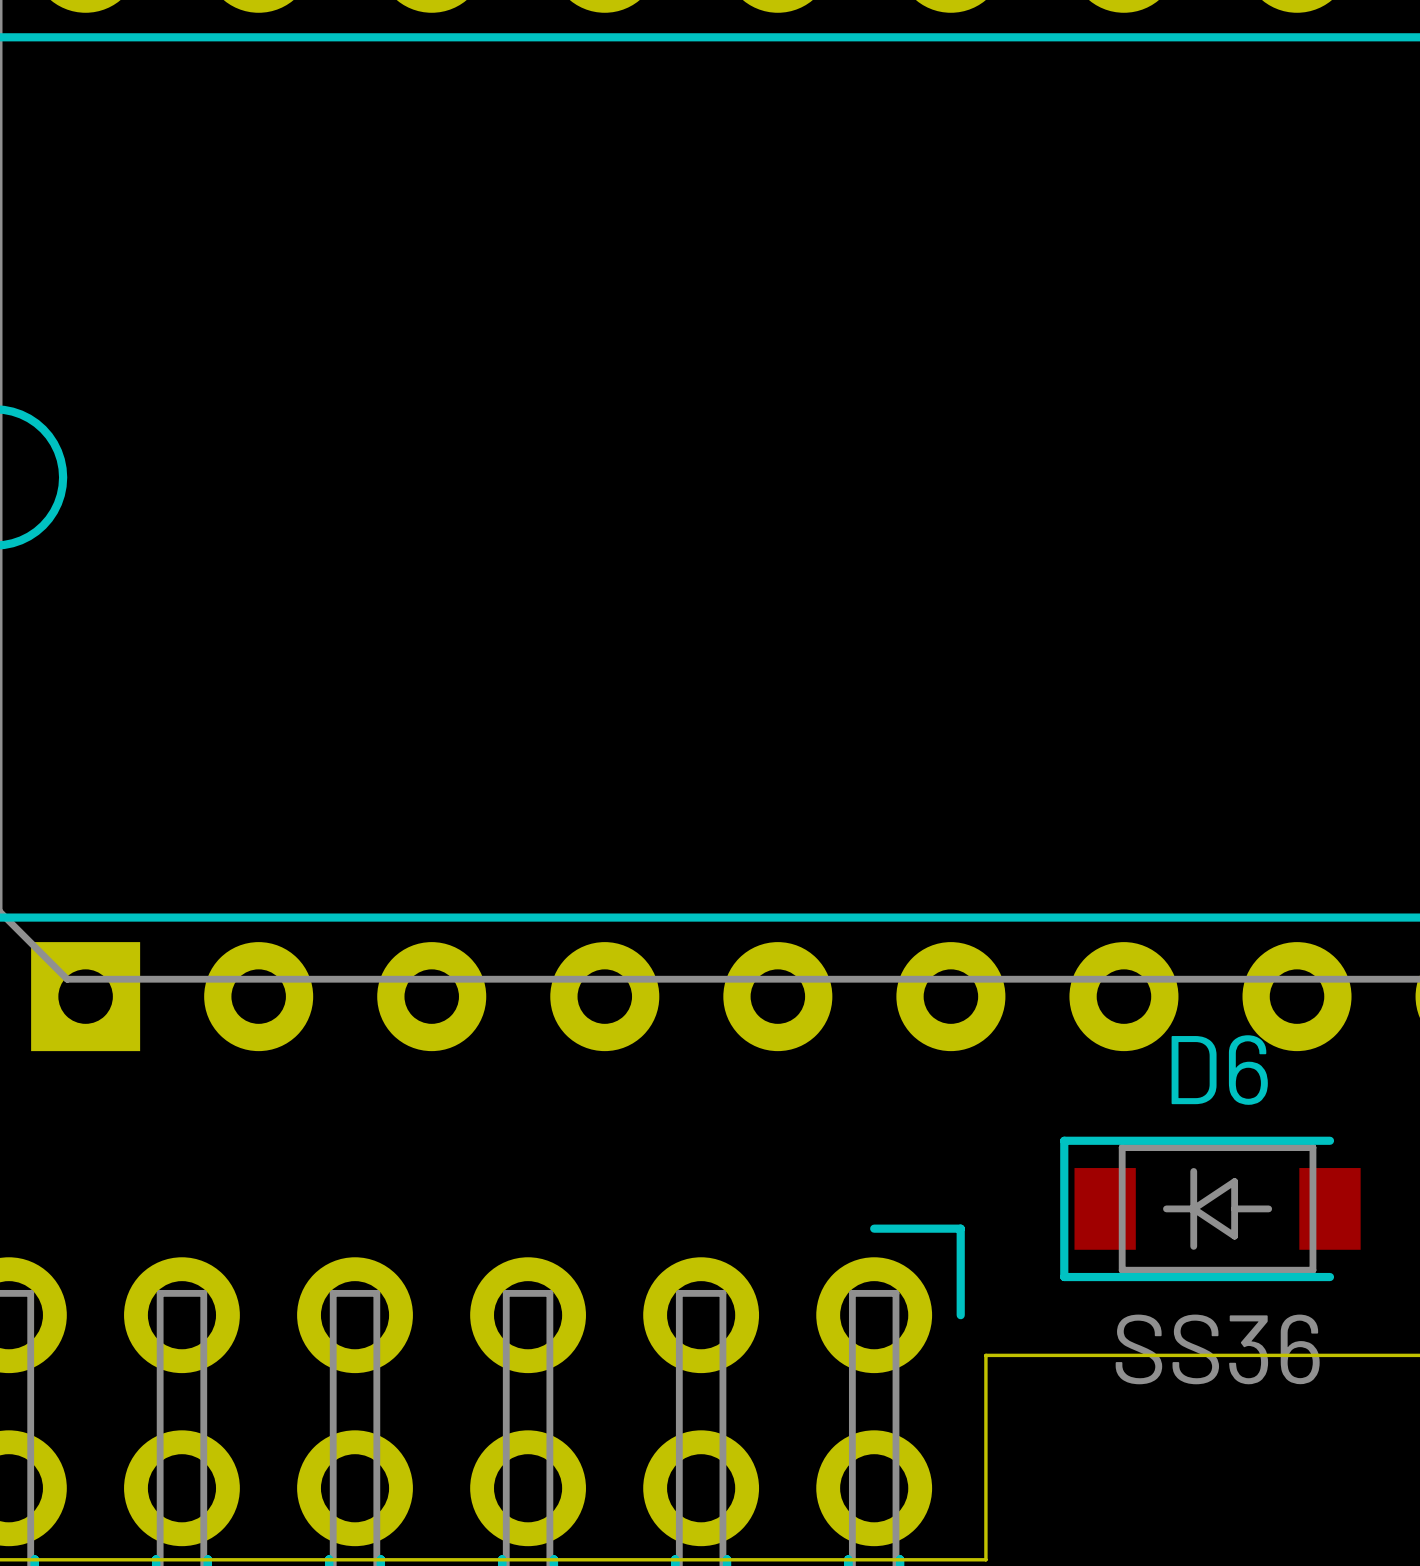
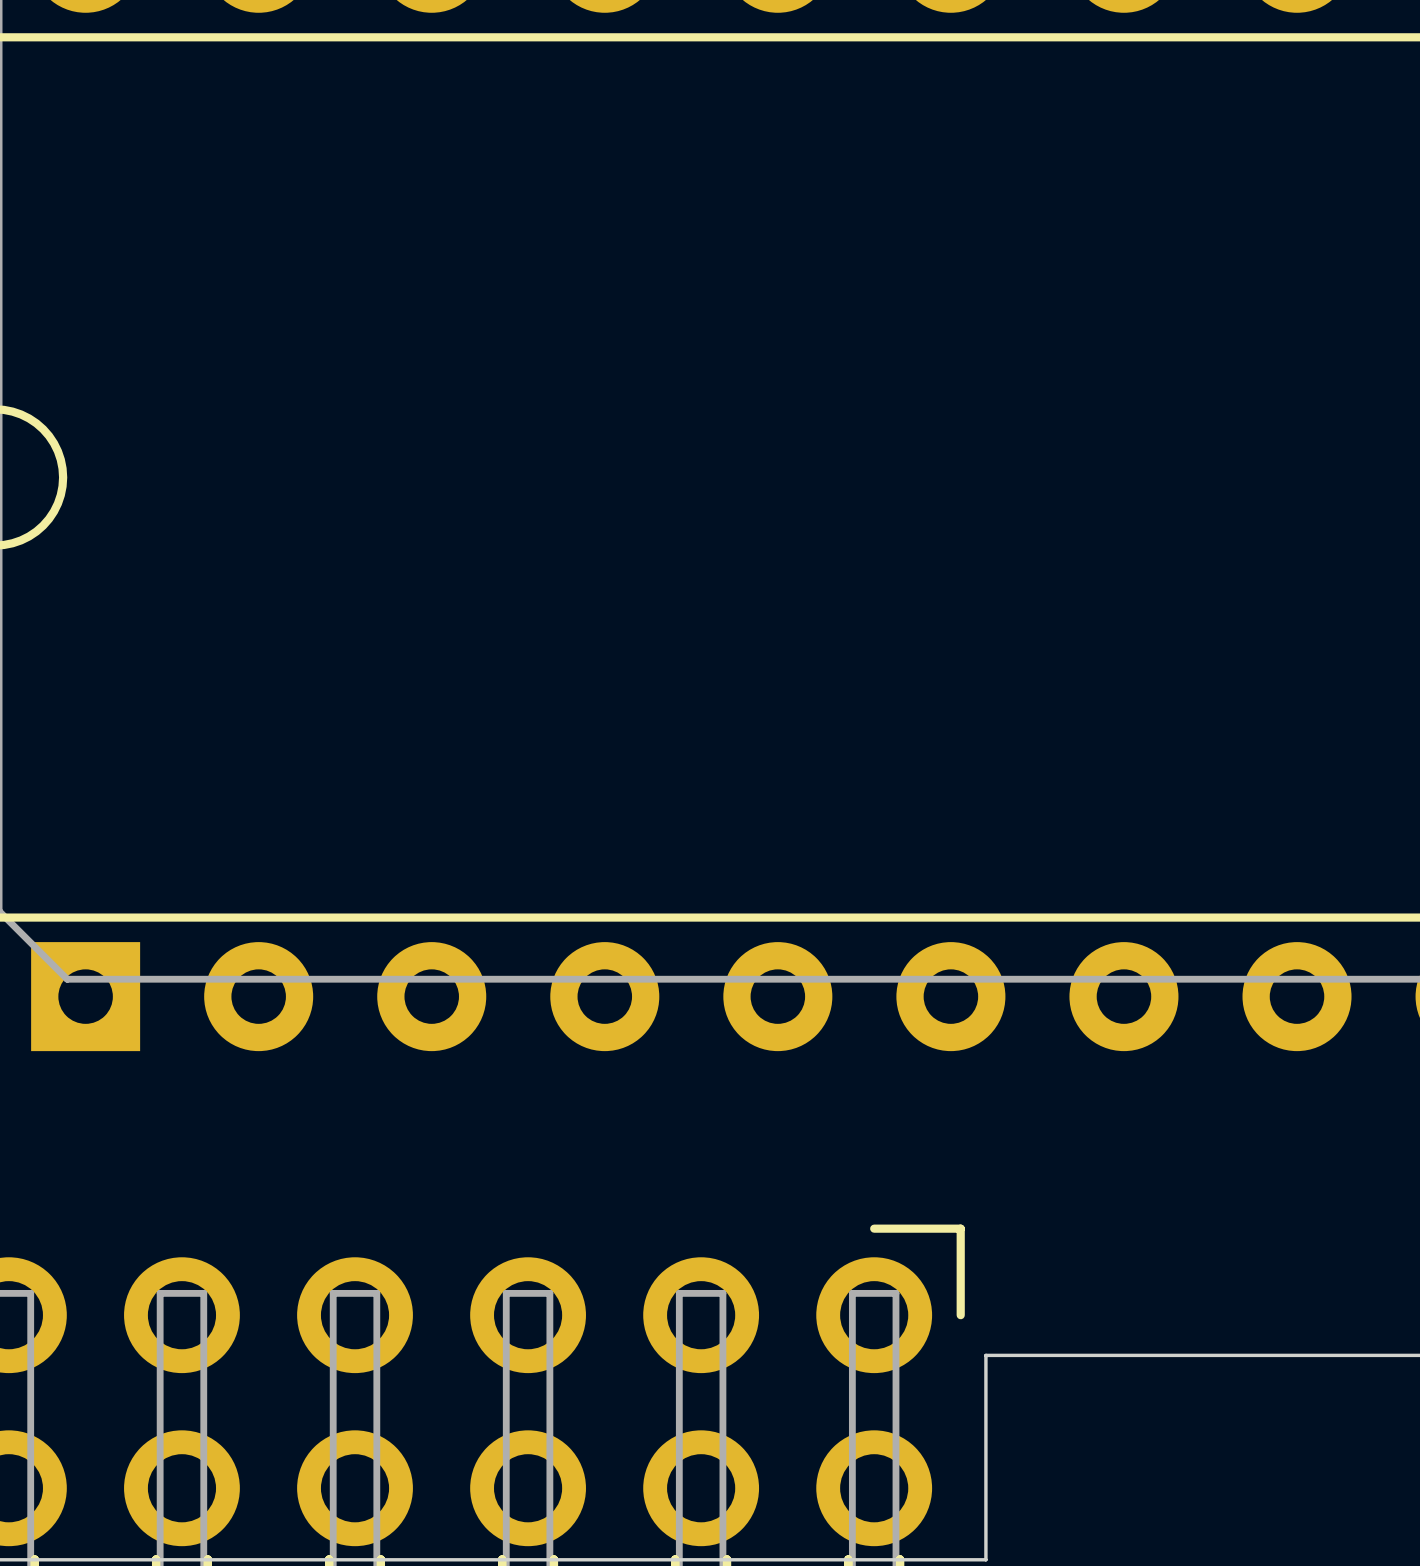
D6: SS36 (1210, 1208) -> none

